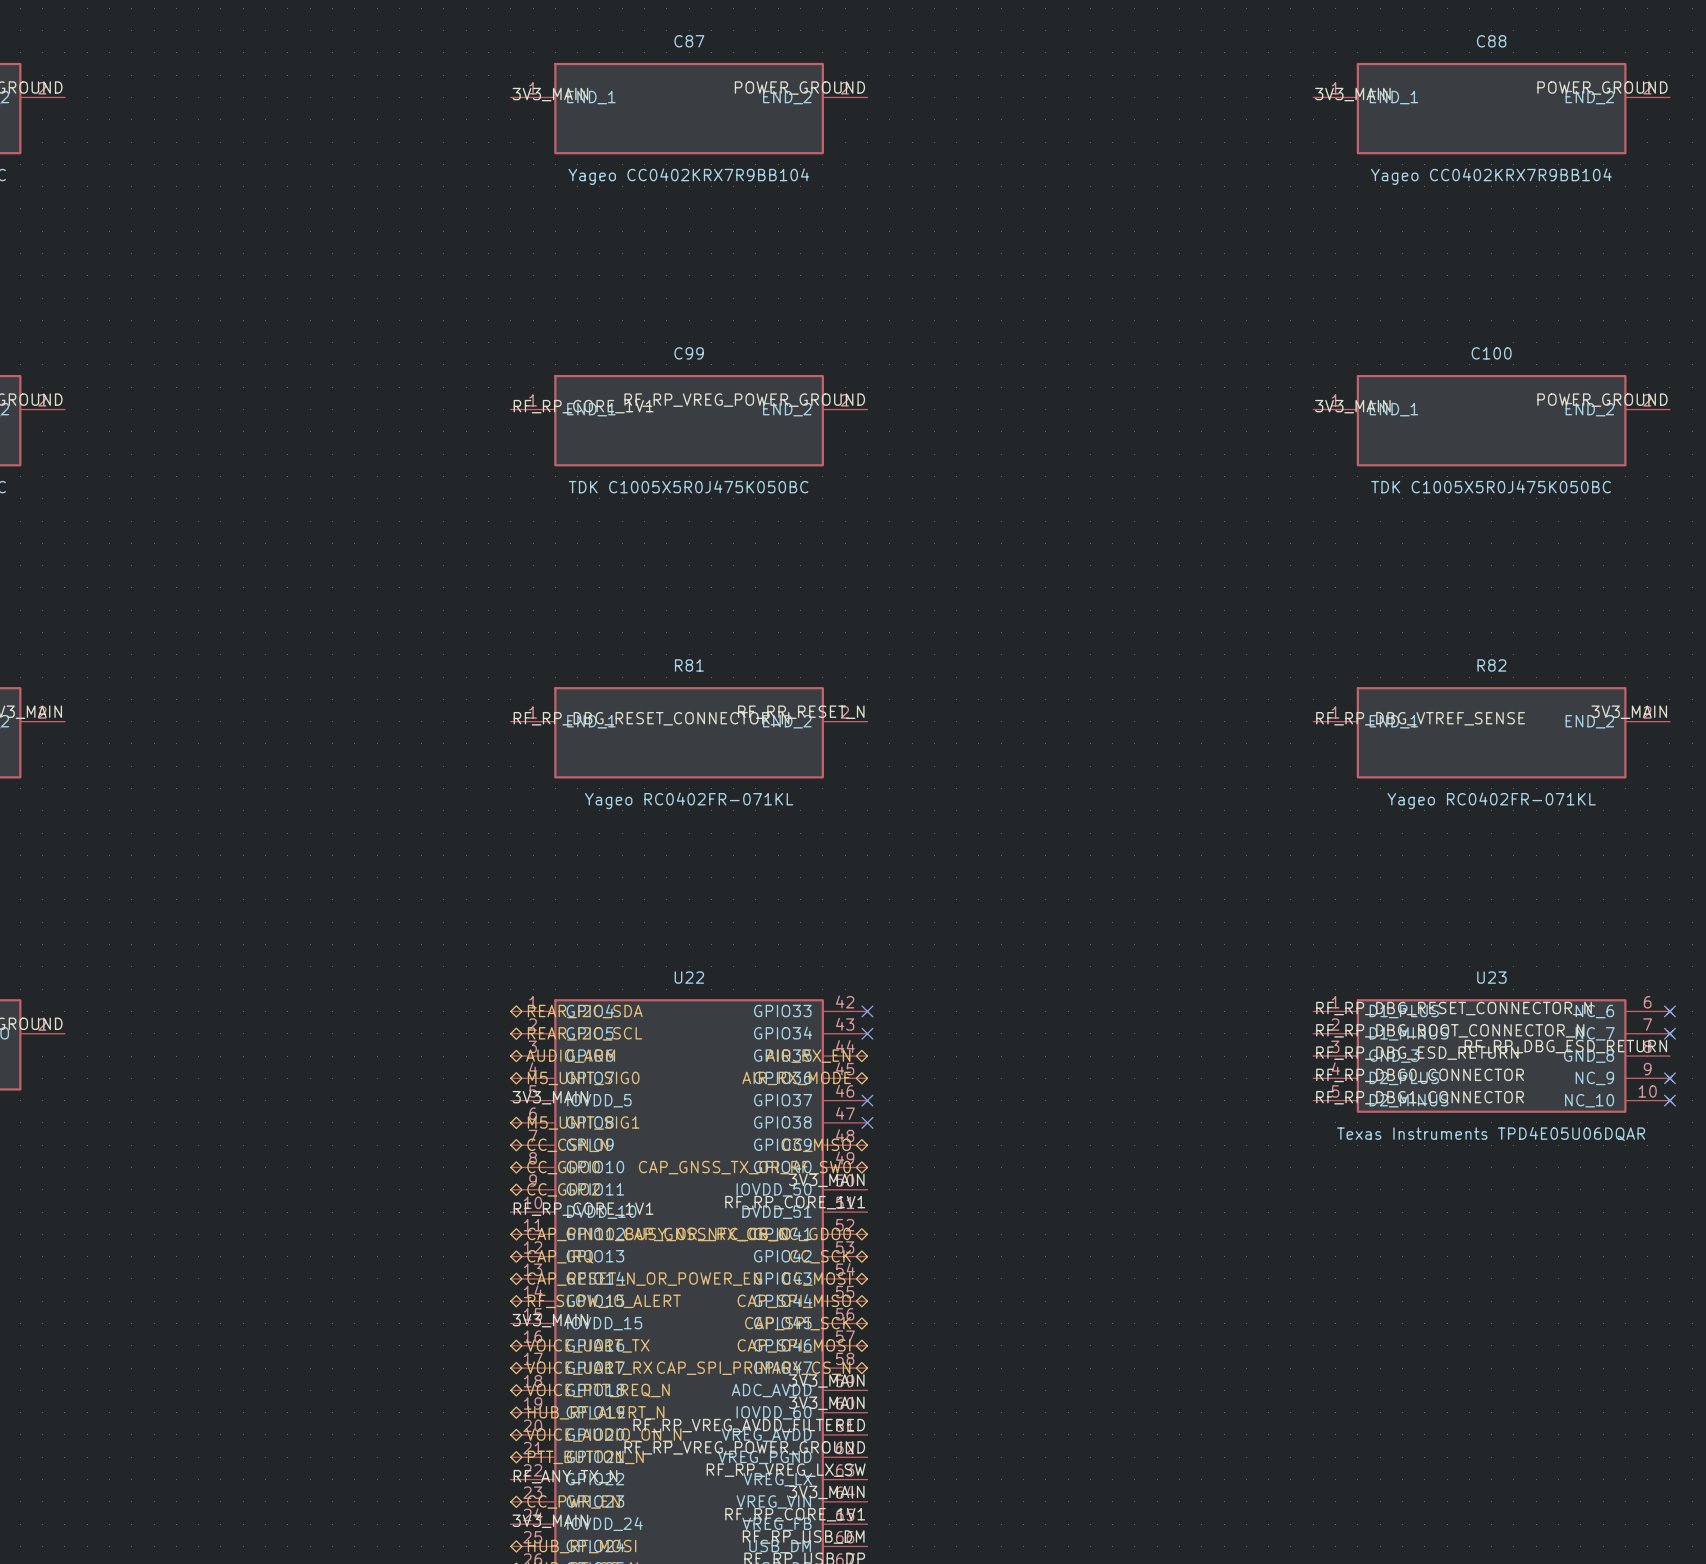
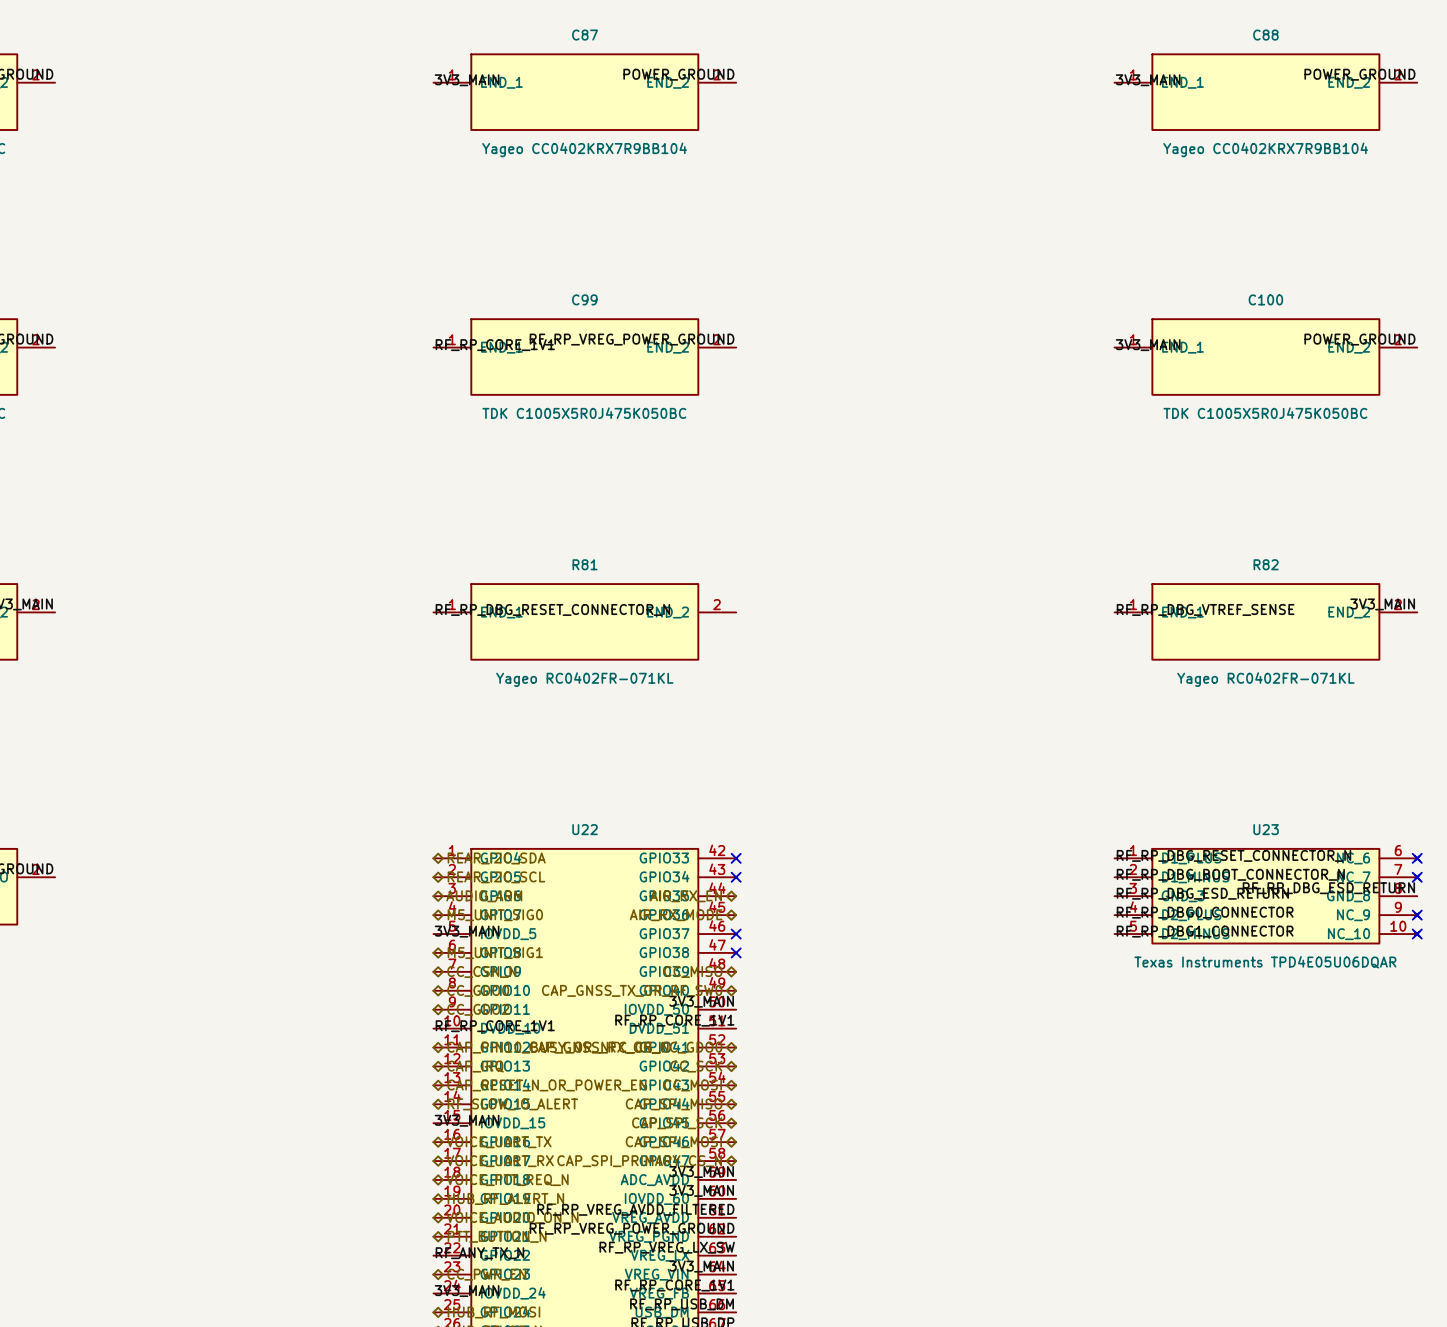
label: RF_RP_RESET_N (801, 712) -> none

